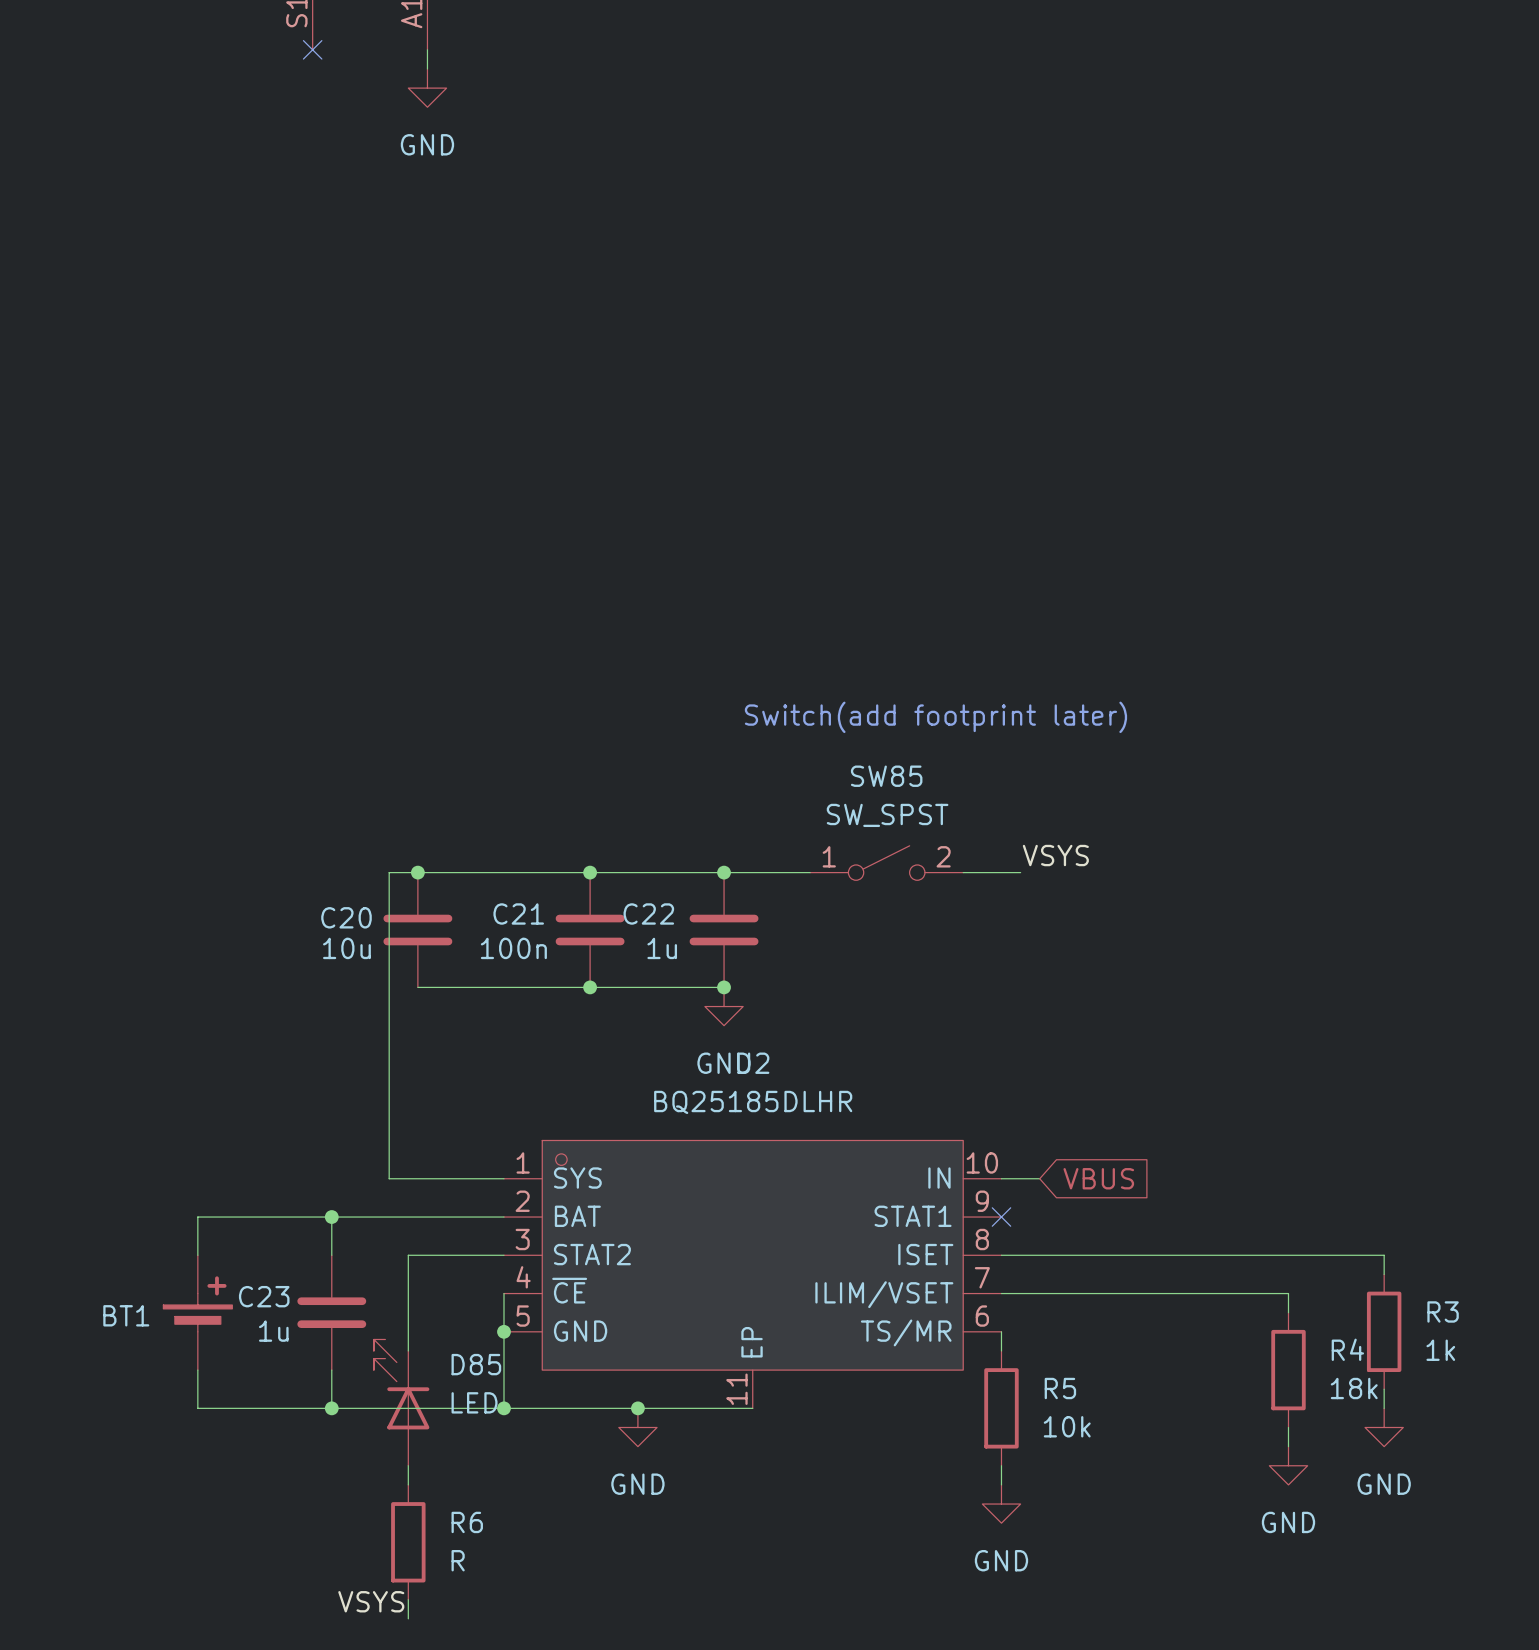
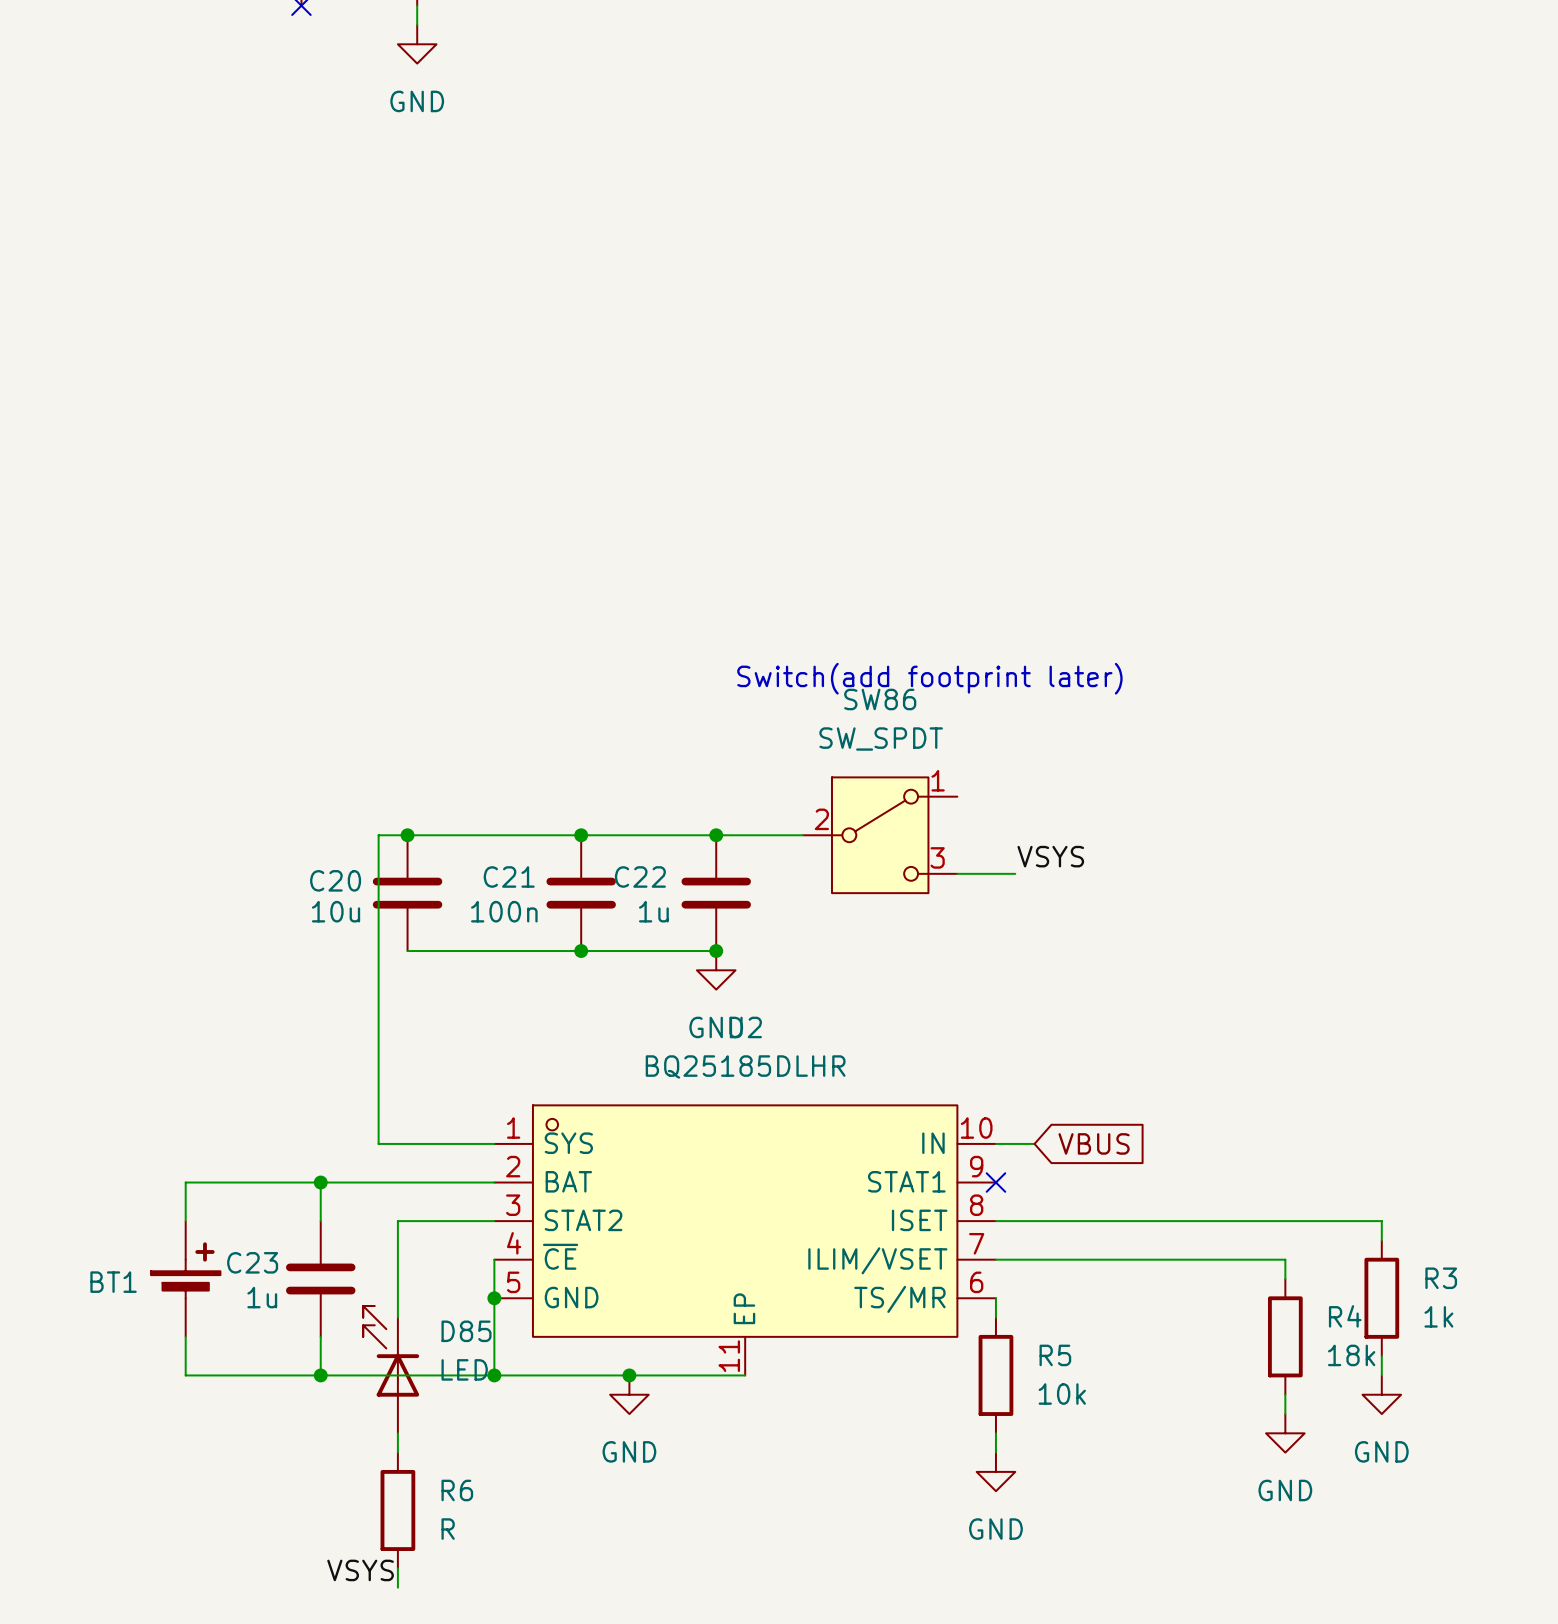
label position: VSYS (1055, 855) -> VSYS (1050, 856)
SW85: SW_SPST (886, 863) -> none
SW86: none -> SW_SPDT (880, 835)
wire: (963, 872) (1020, 872) -> (957, 873) (1015, 873)

